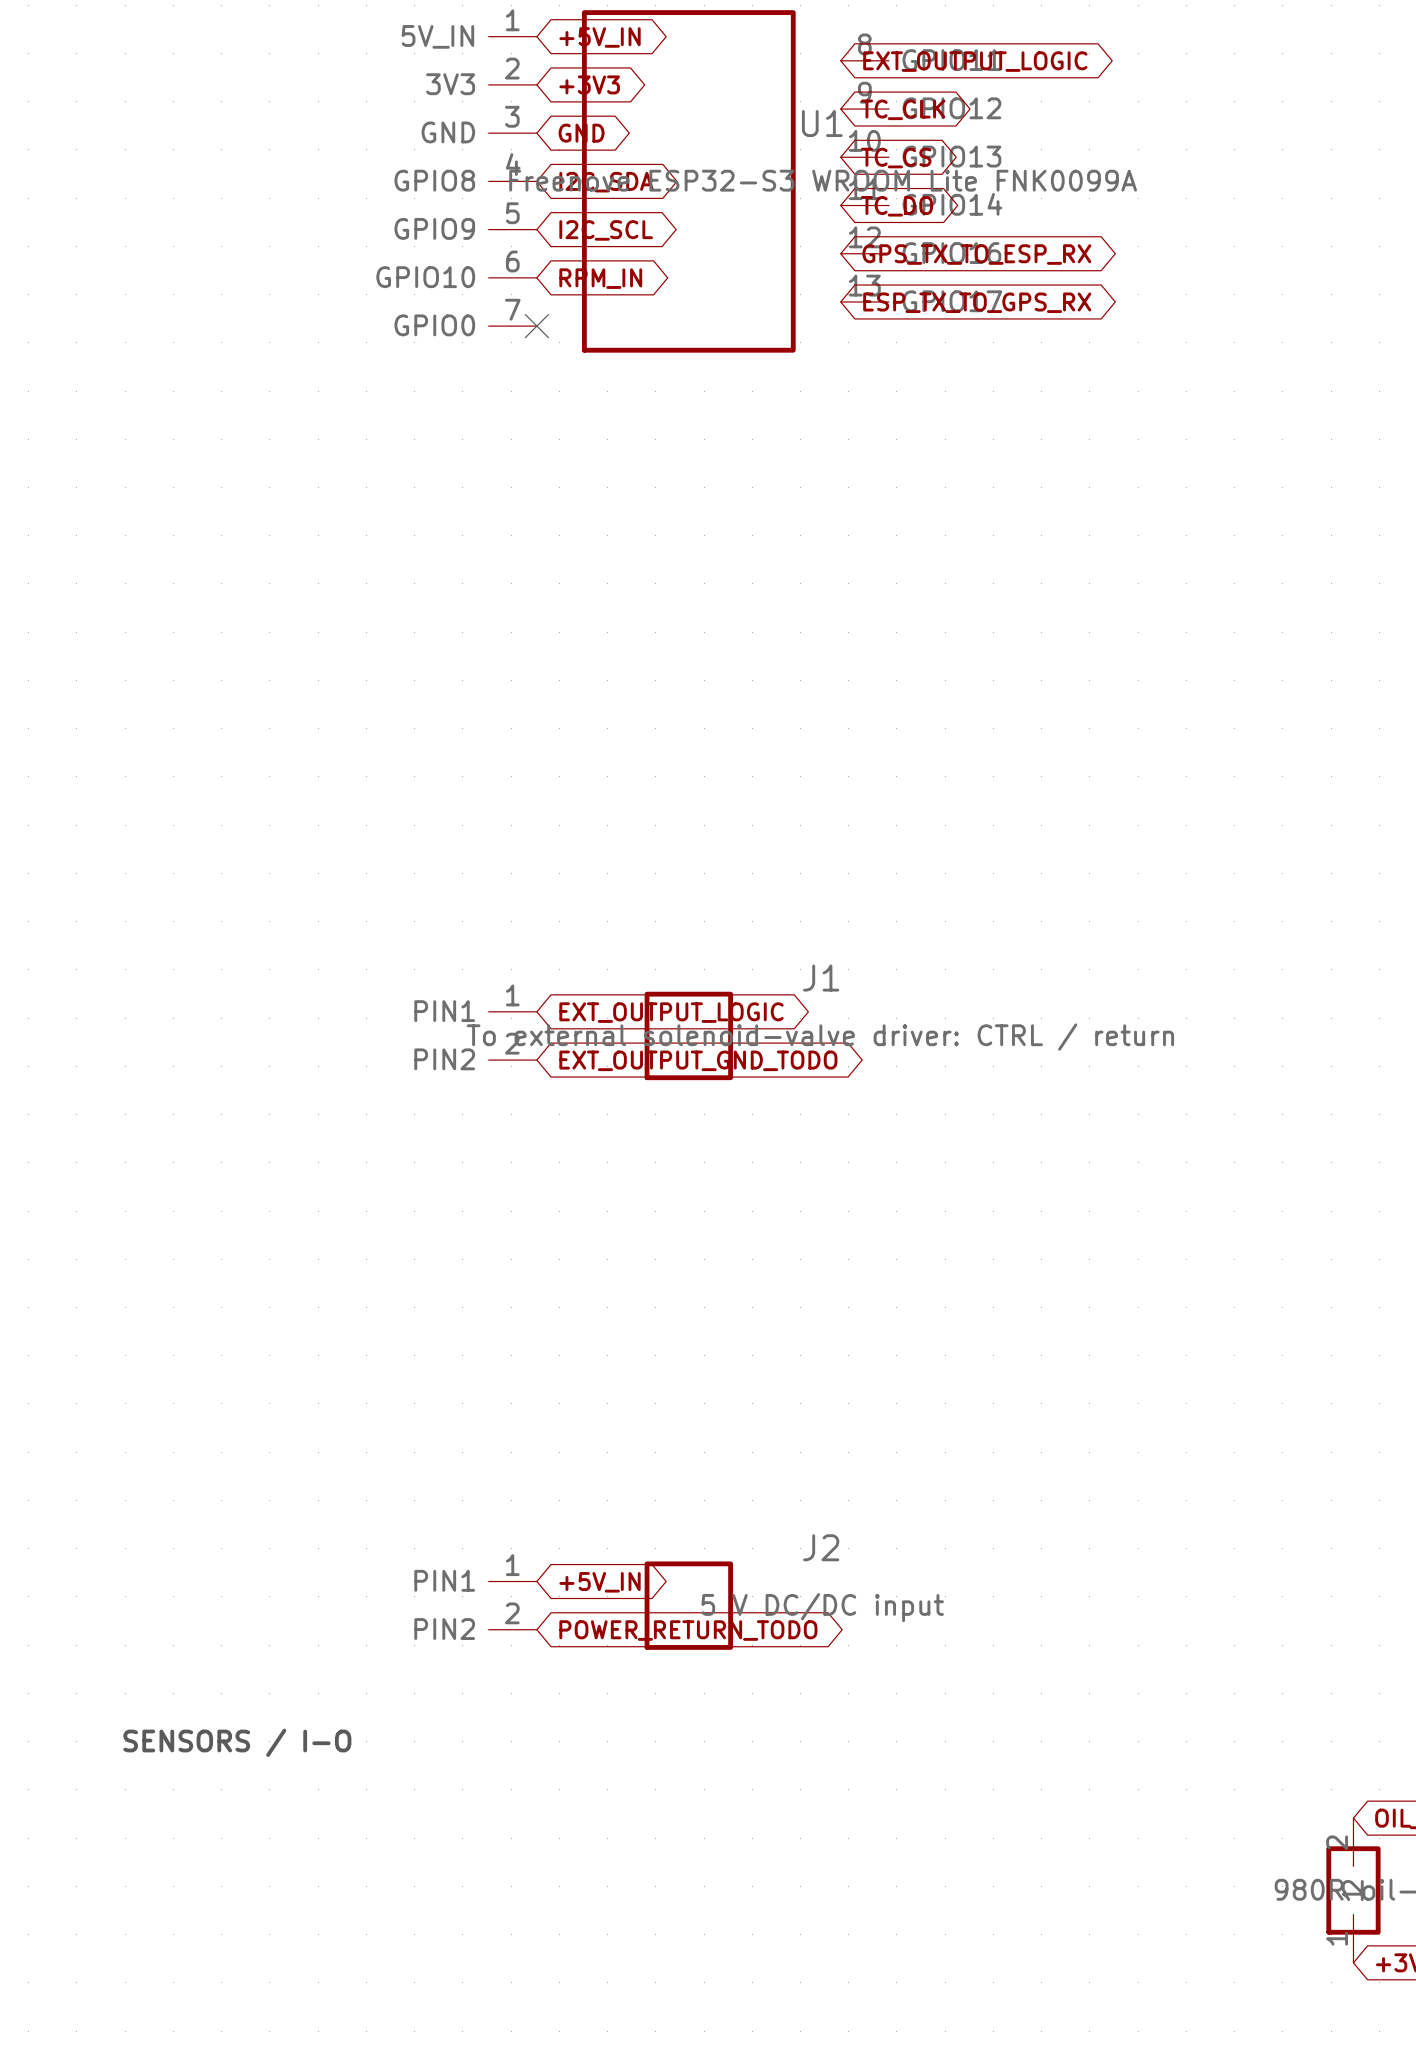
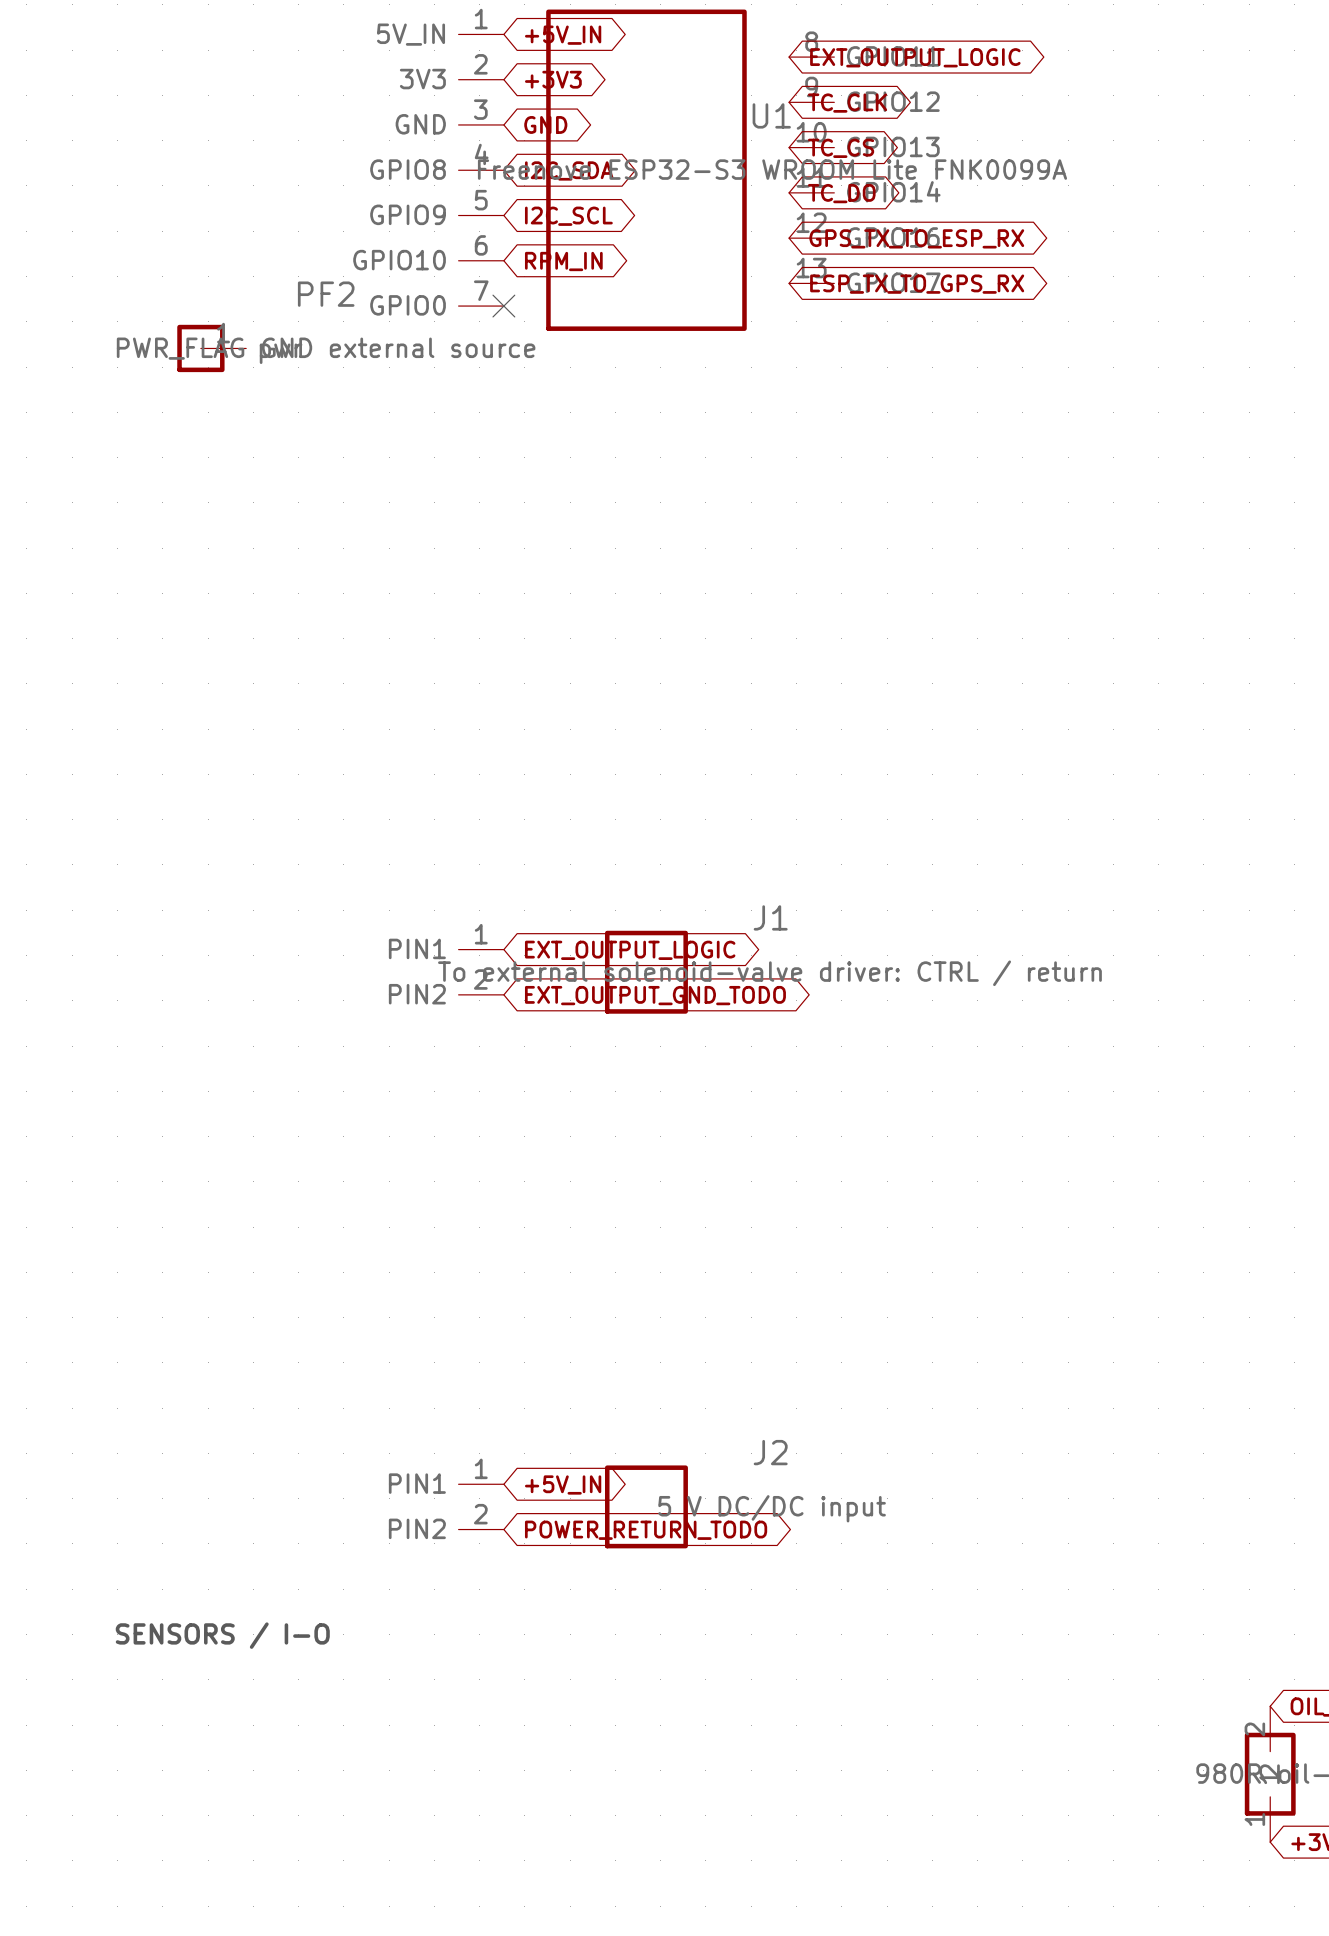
PF2: none -> PWR_FLAG GND external source (211, 348)

